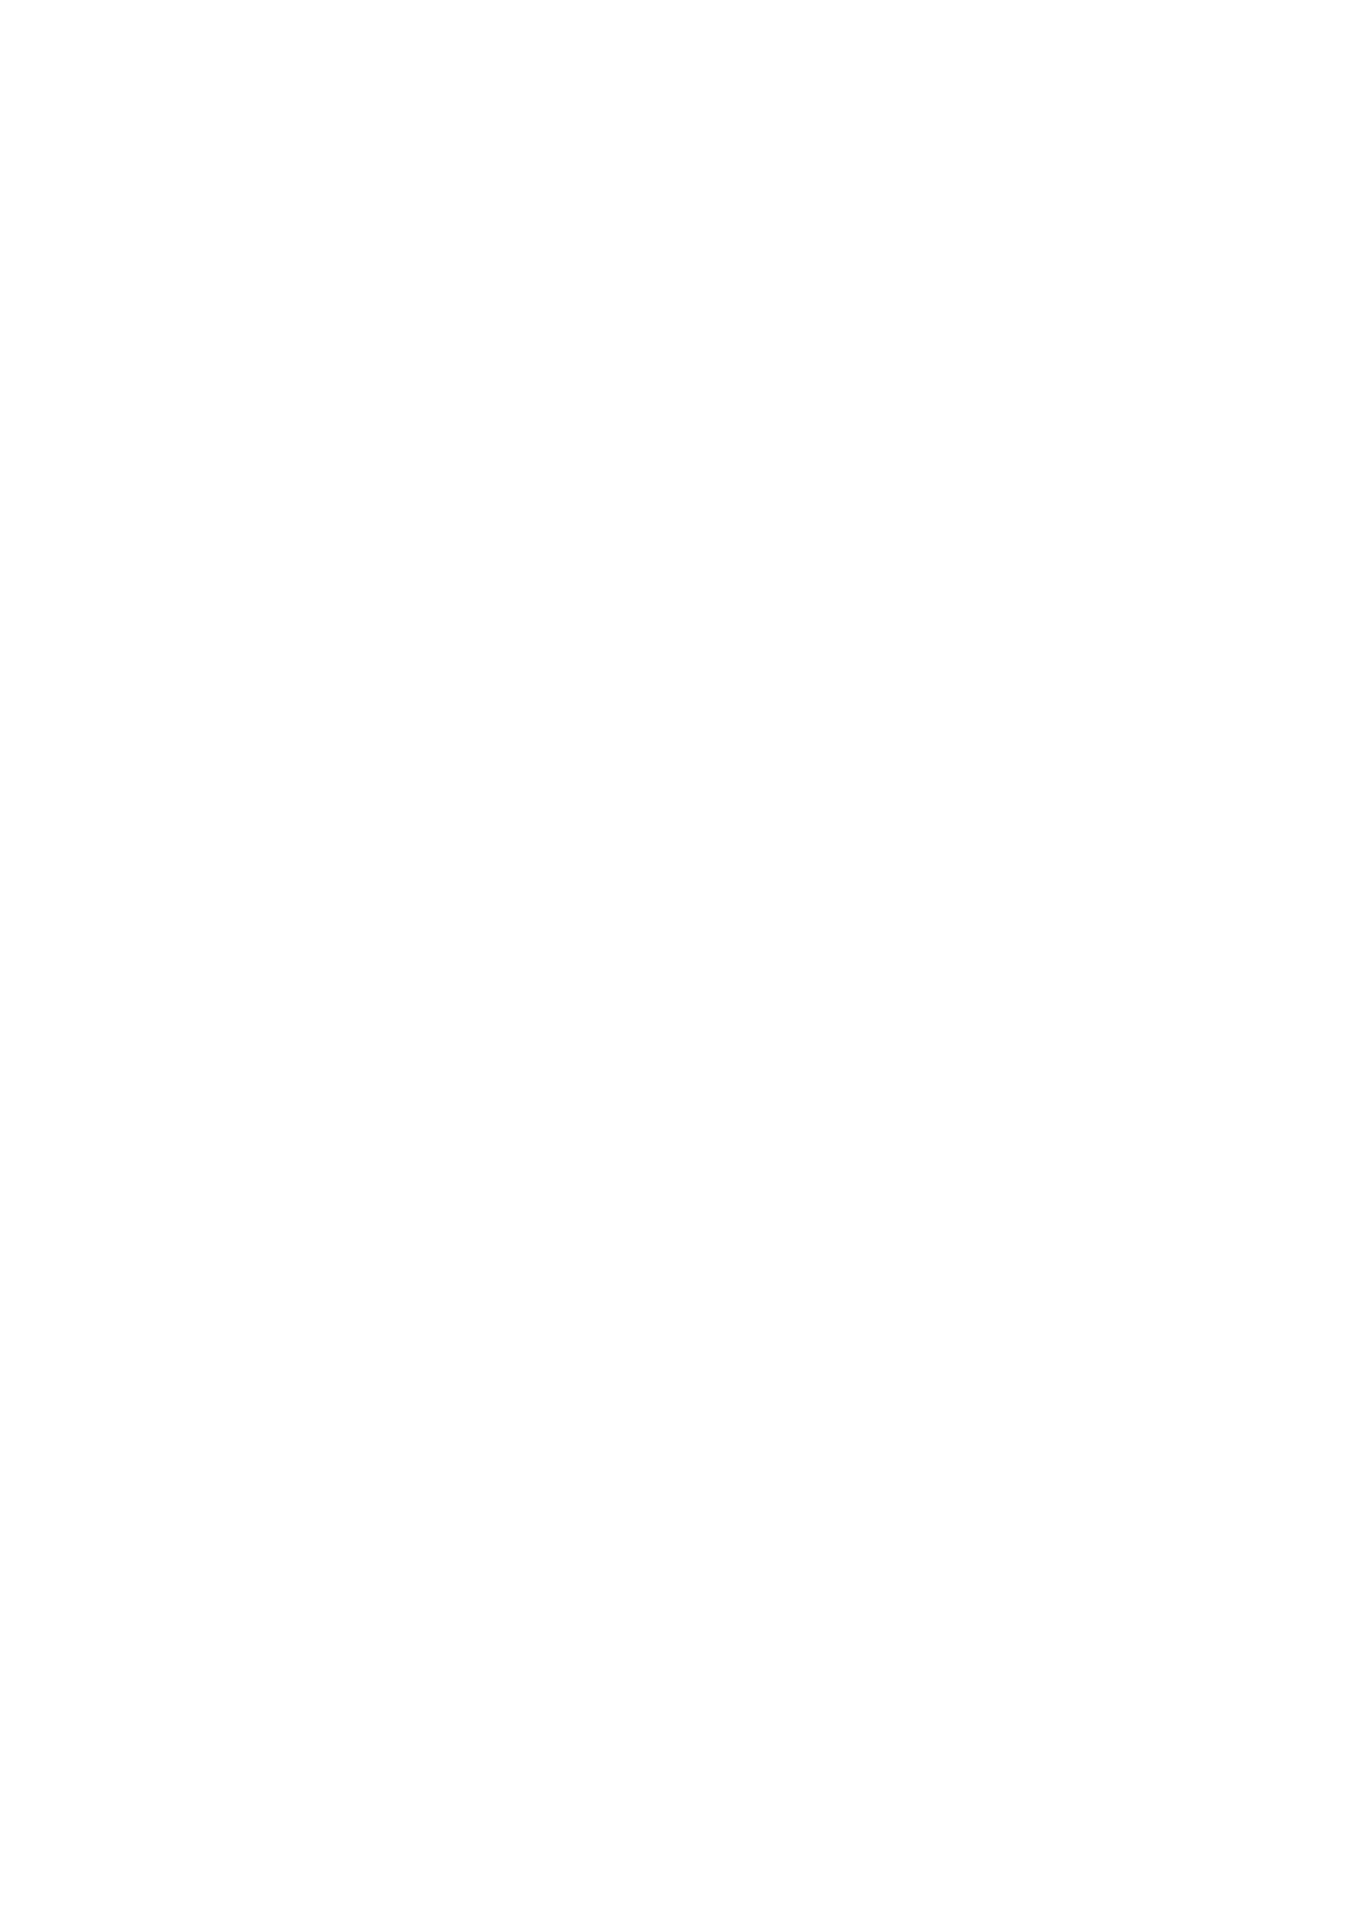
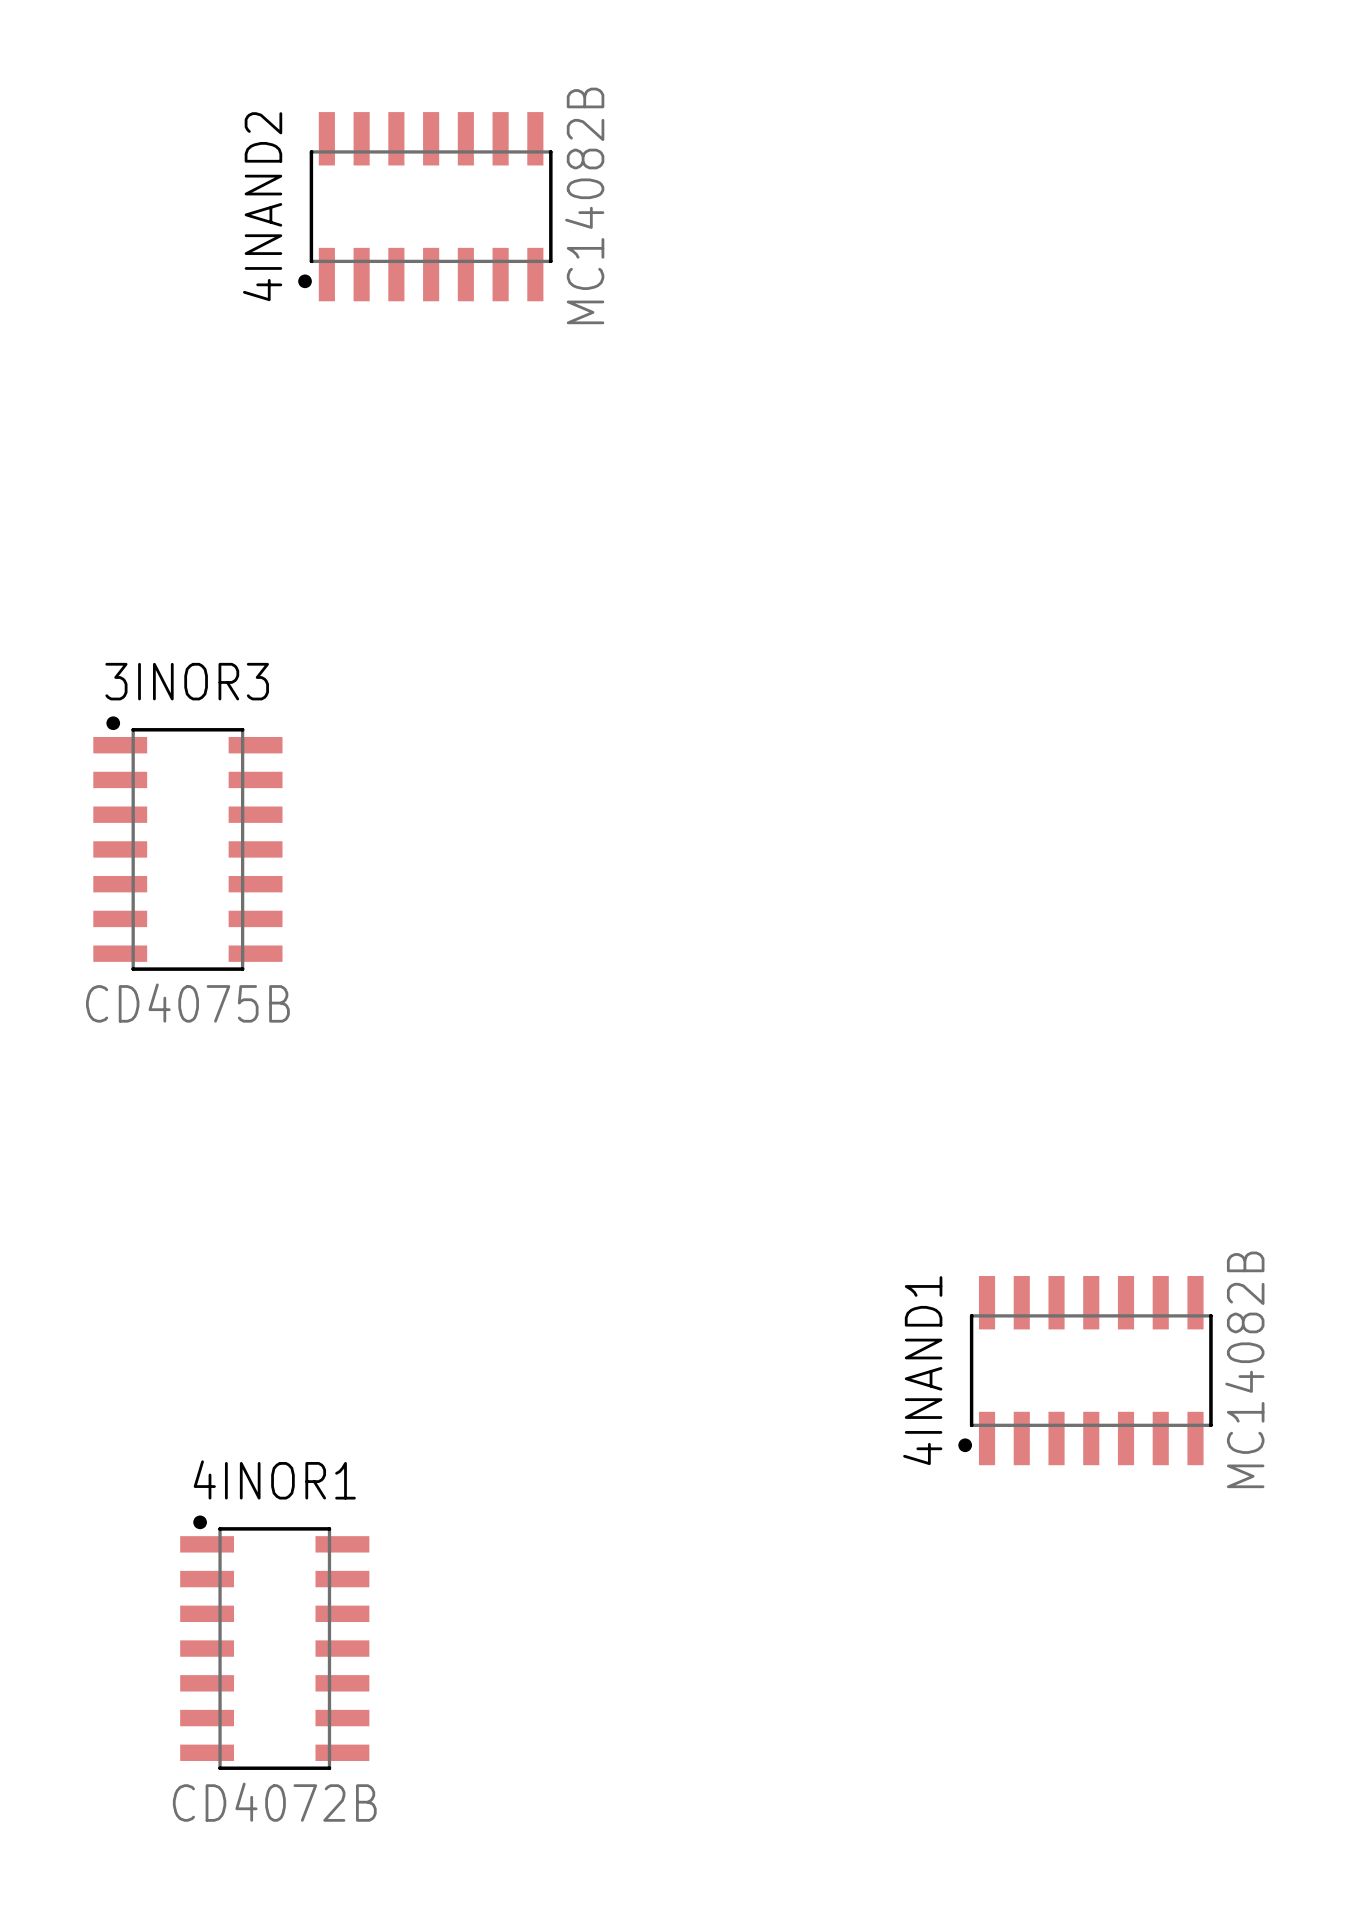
4INAND2: none -> MC14082B (425, 206)
3INOR3: none -> CD4075B (187, 843)
4INAND1: none -> MC14082B (1085, 1370)
4INOR1: none -> CD4072B (274, 1642)

